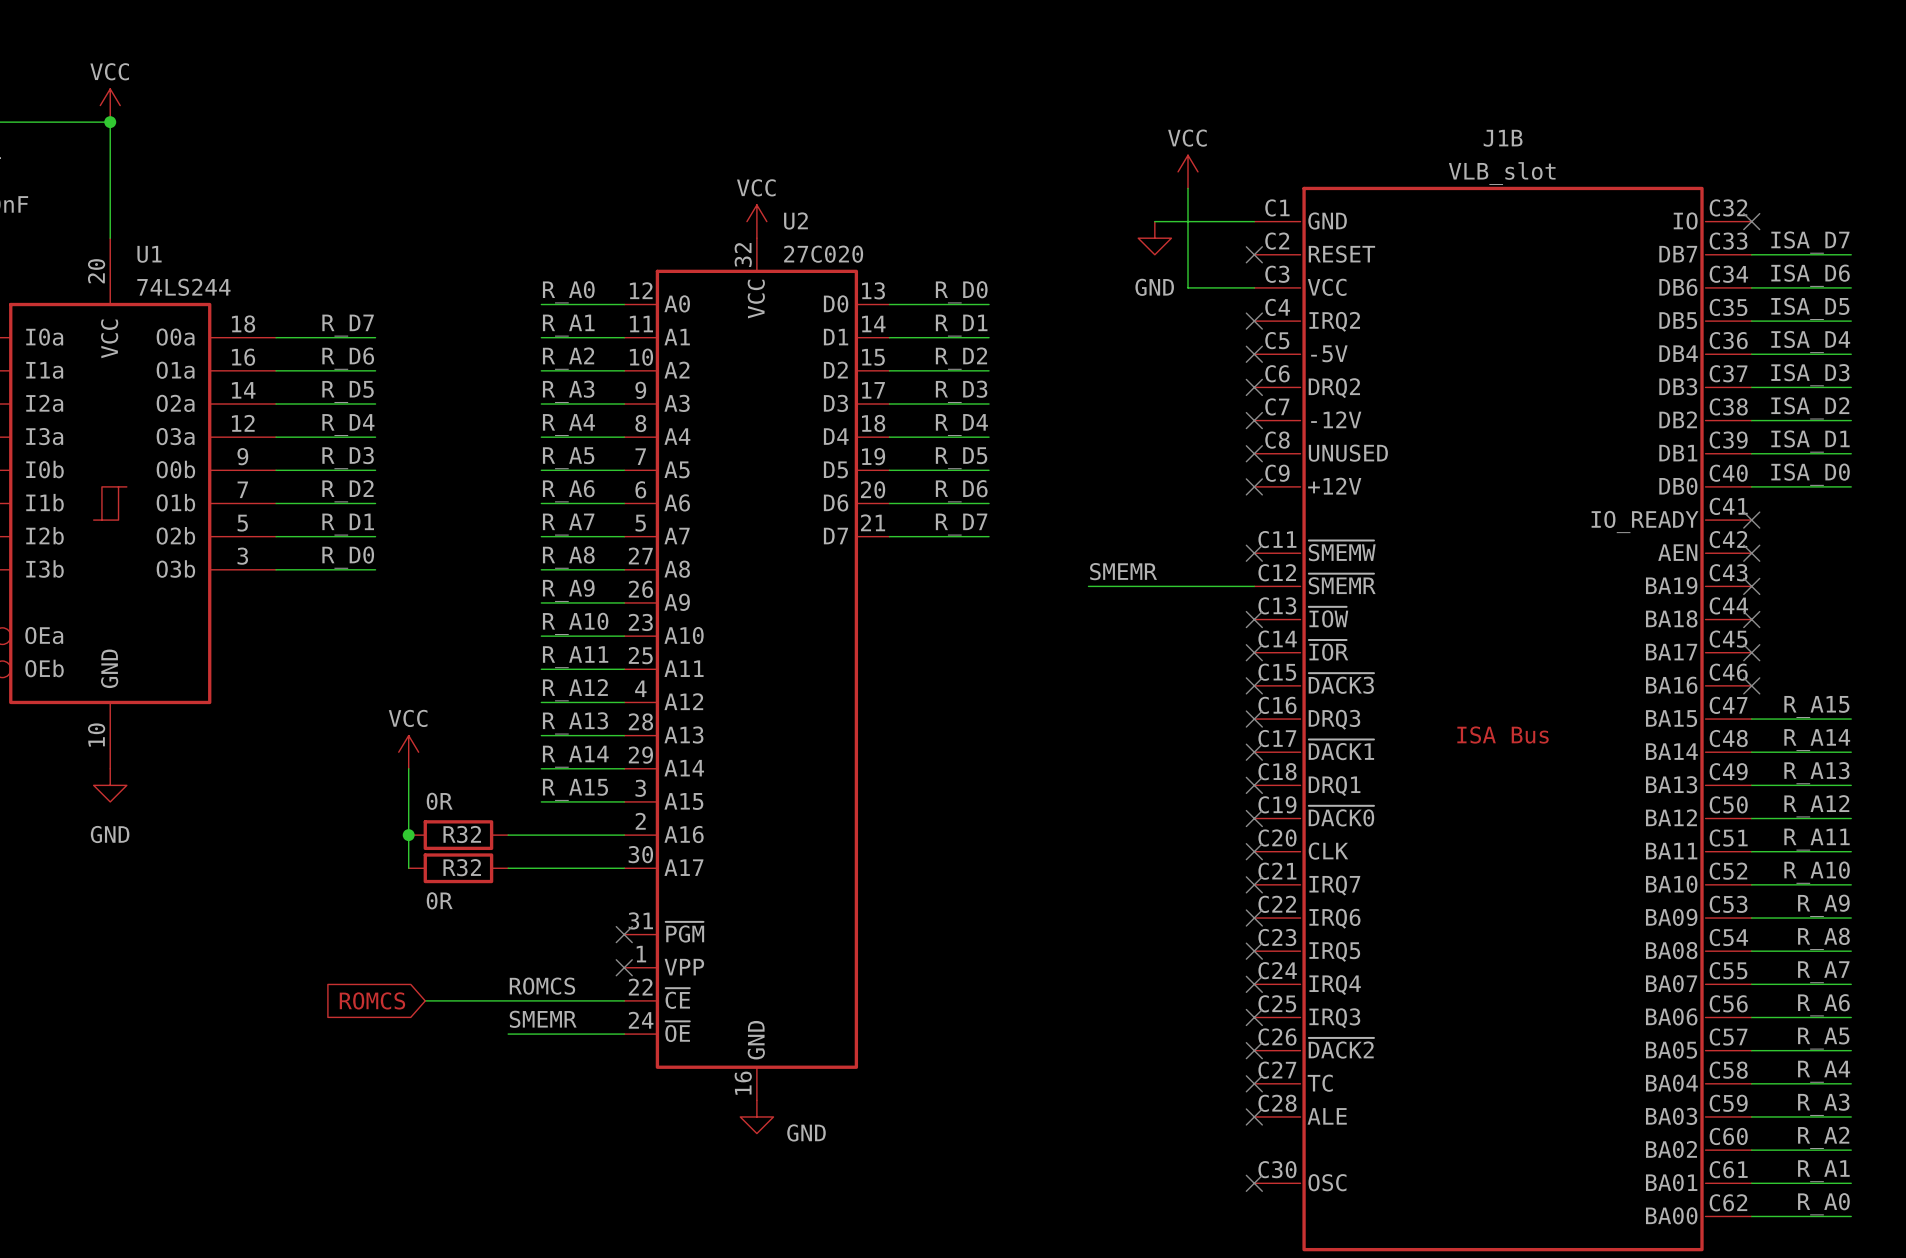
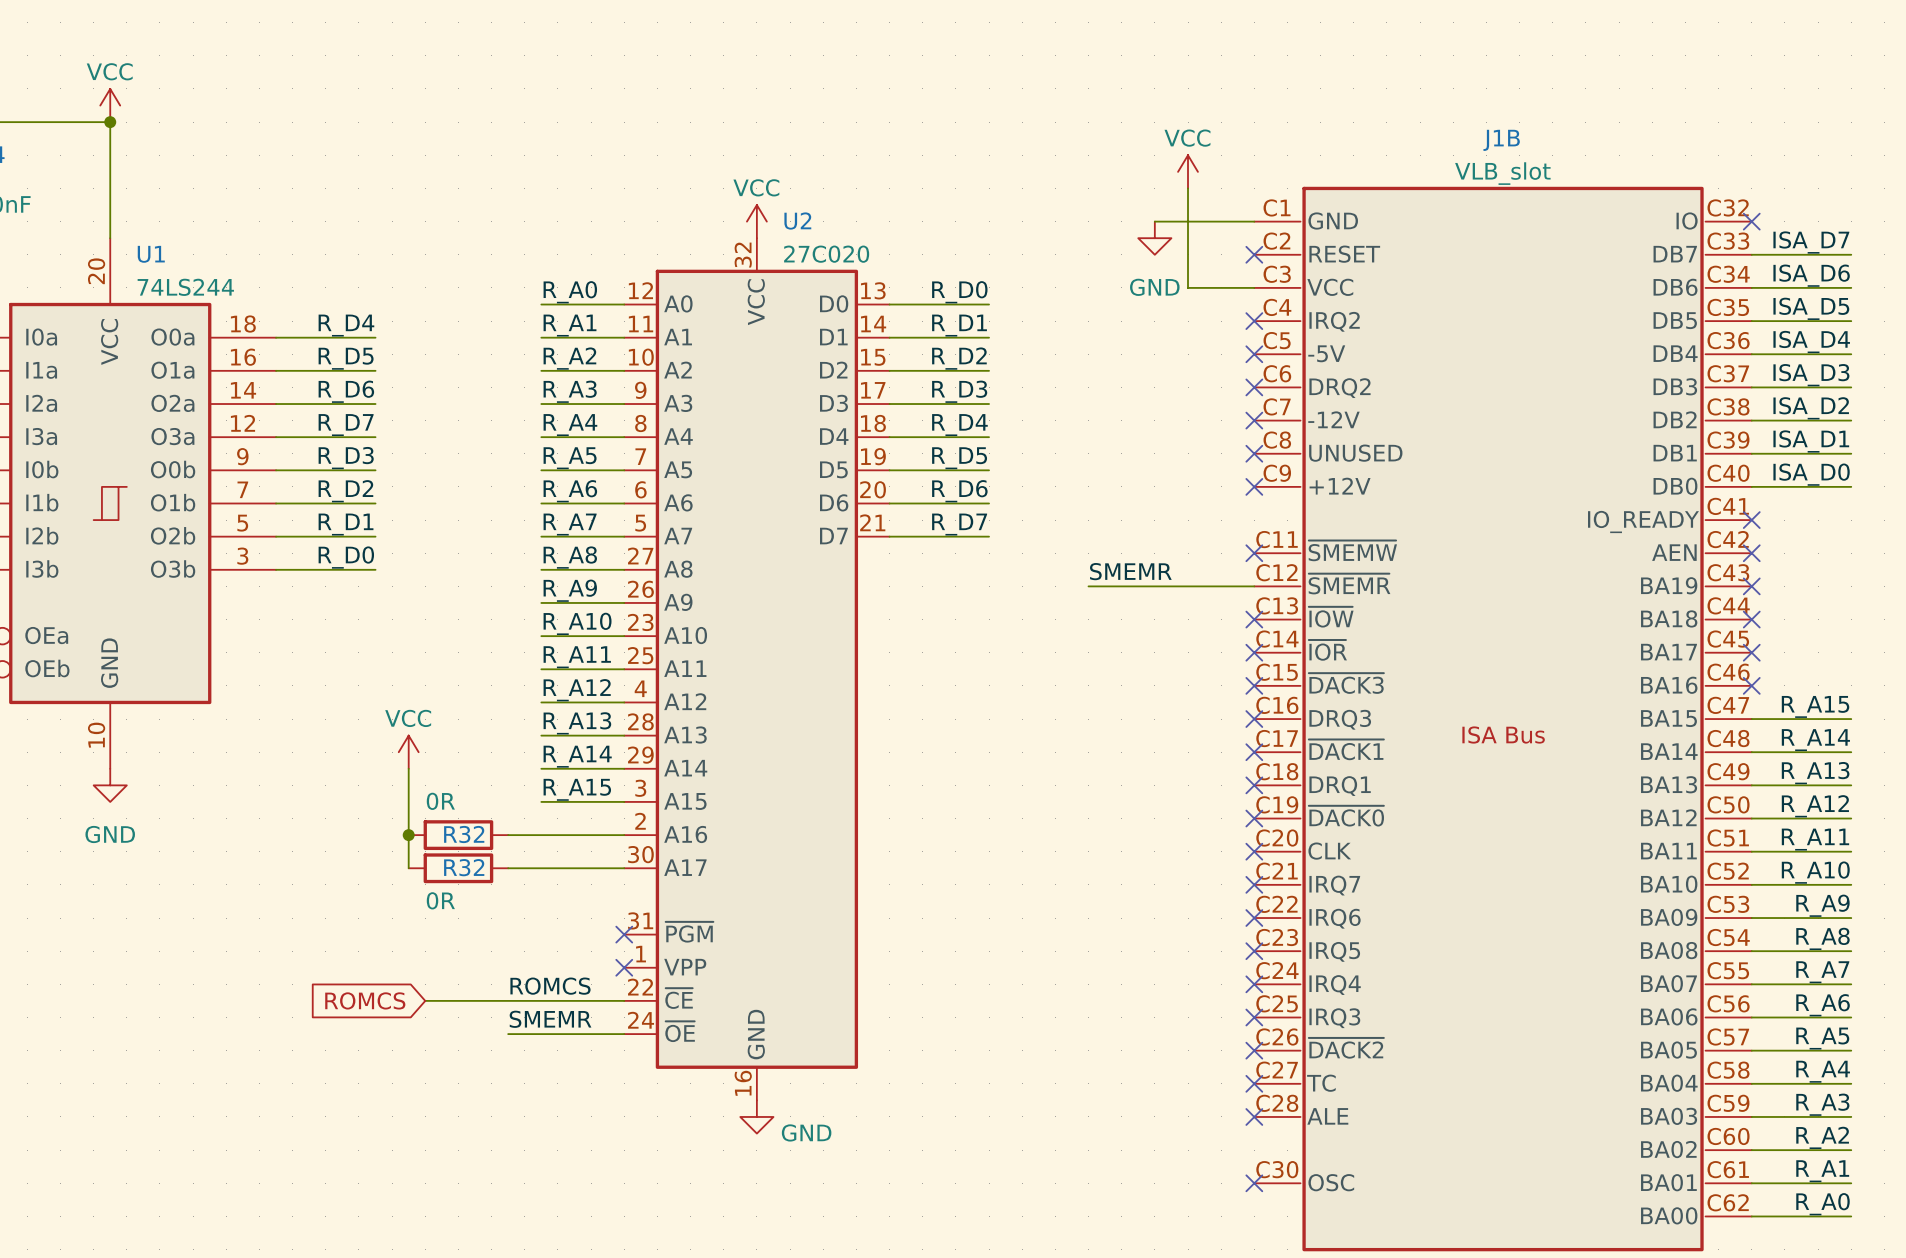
label: R_D7 (348, 325) -> R_D4 (346, 325)
label: R_D6 (348, 358) -> R_D5 (346, 358)
label: R_D5 (348, 391) -> R_D6 (346, 391)
label: R_D4 (348, 425) -> R_D7 (346, 425)

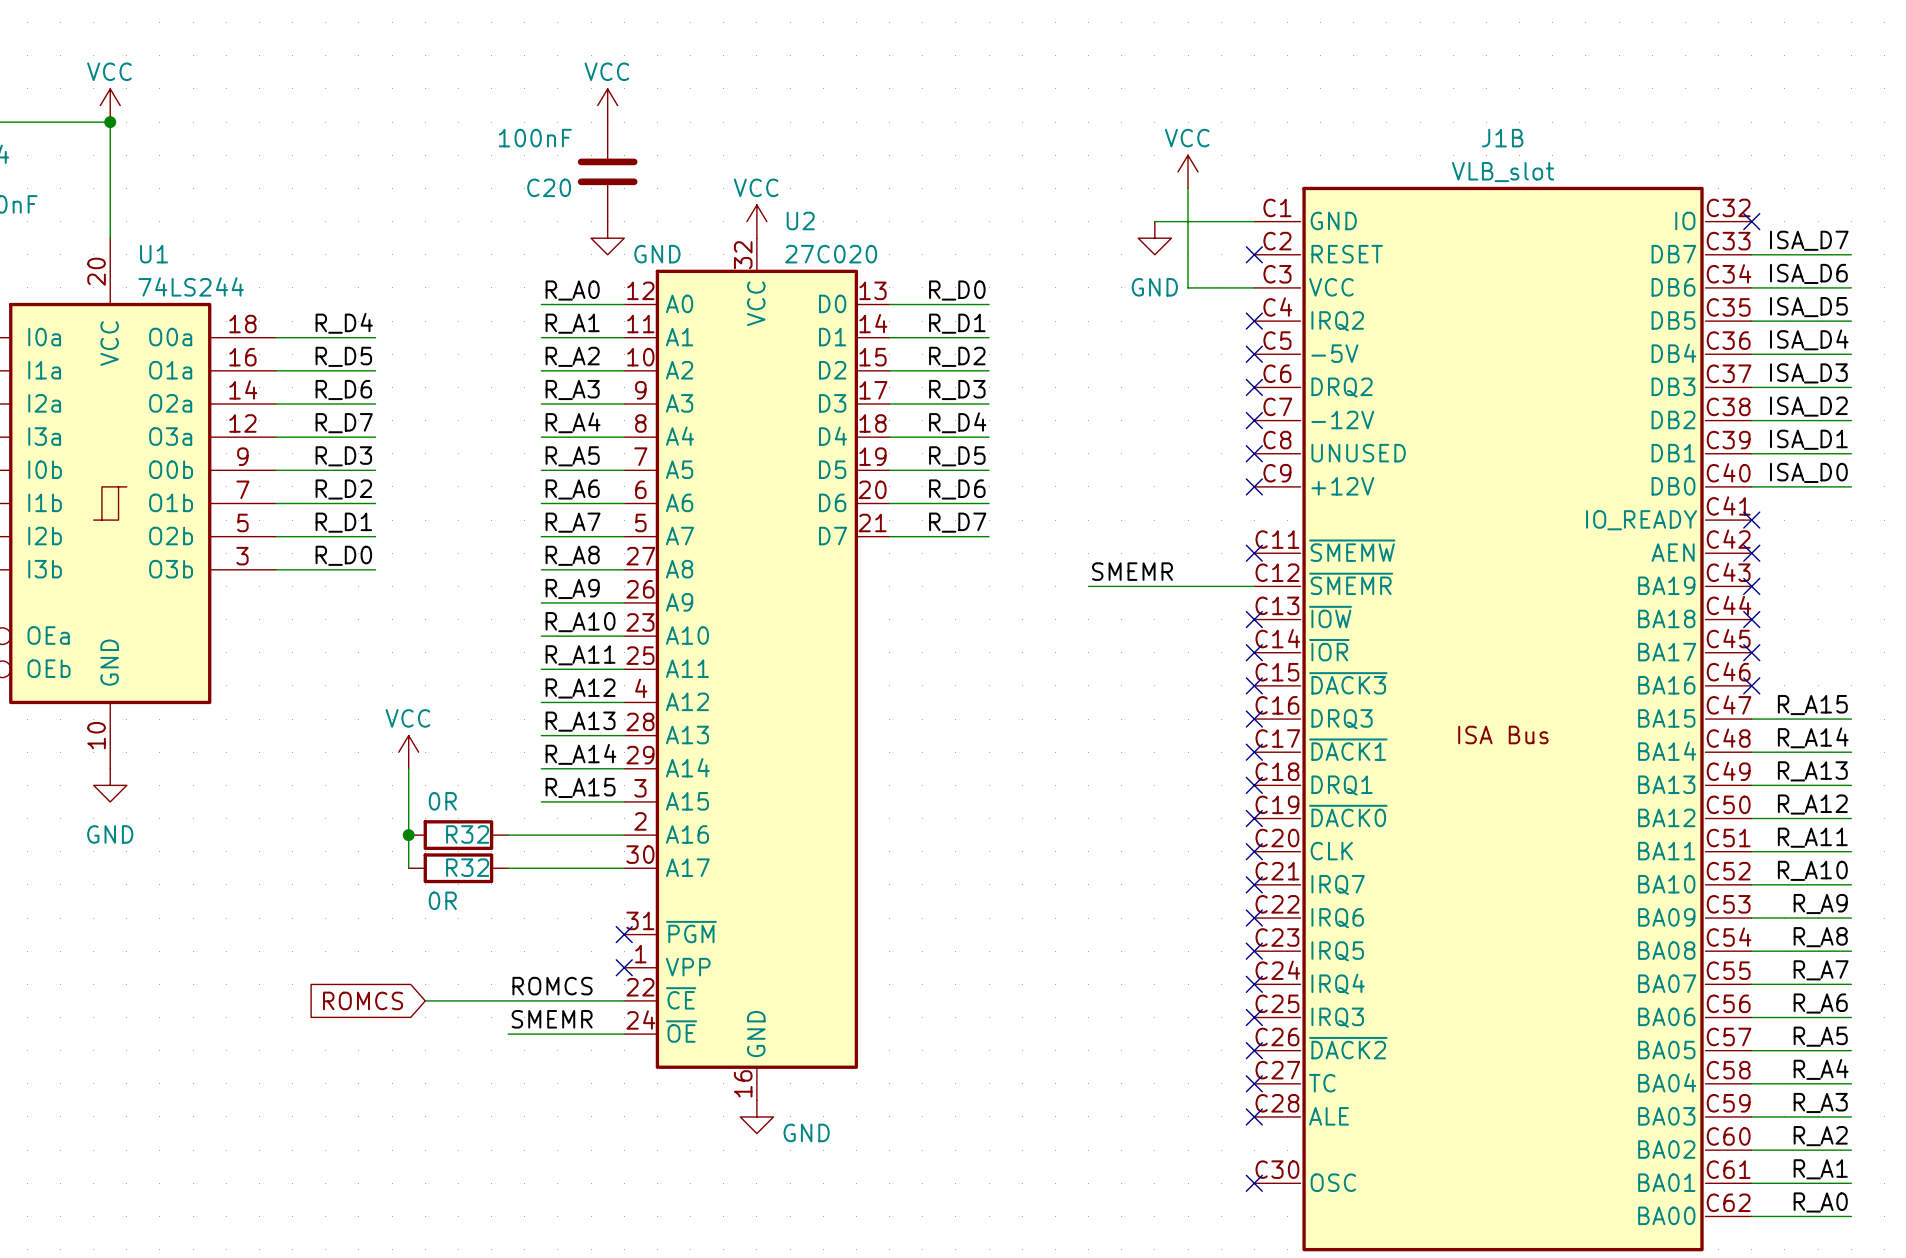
power symbol: none -> VCC (607, 105)
C20: none -> 100nF (607, 171)
power symbol: none -> GND (607, 238)

